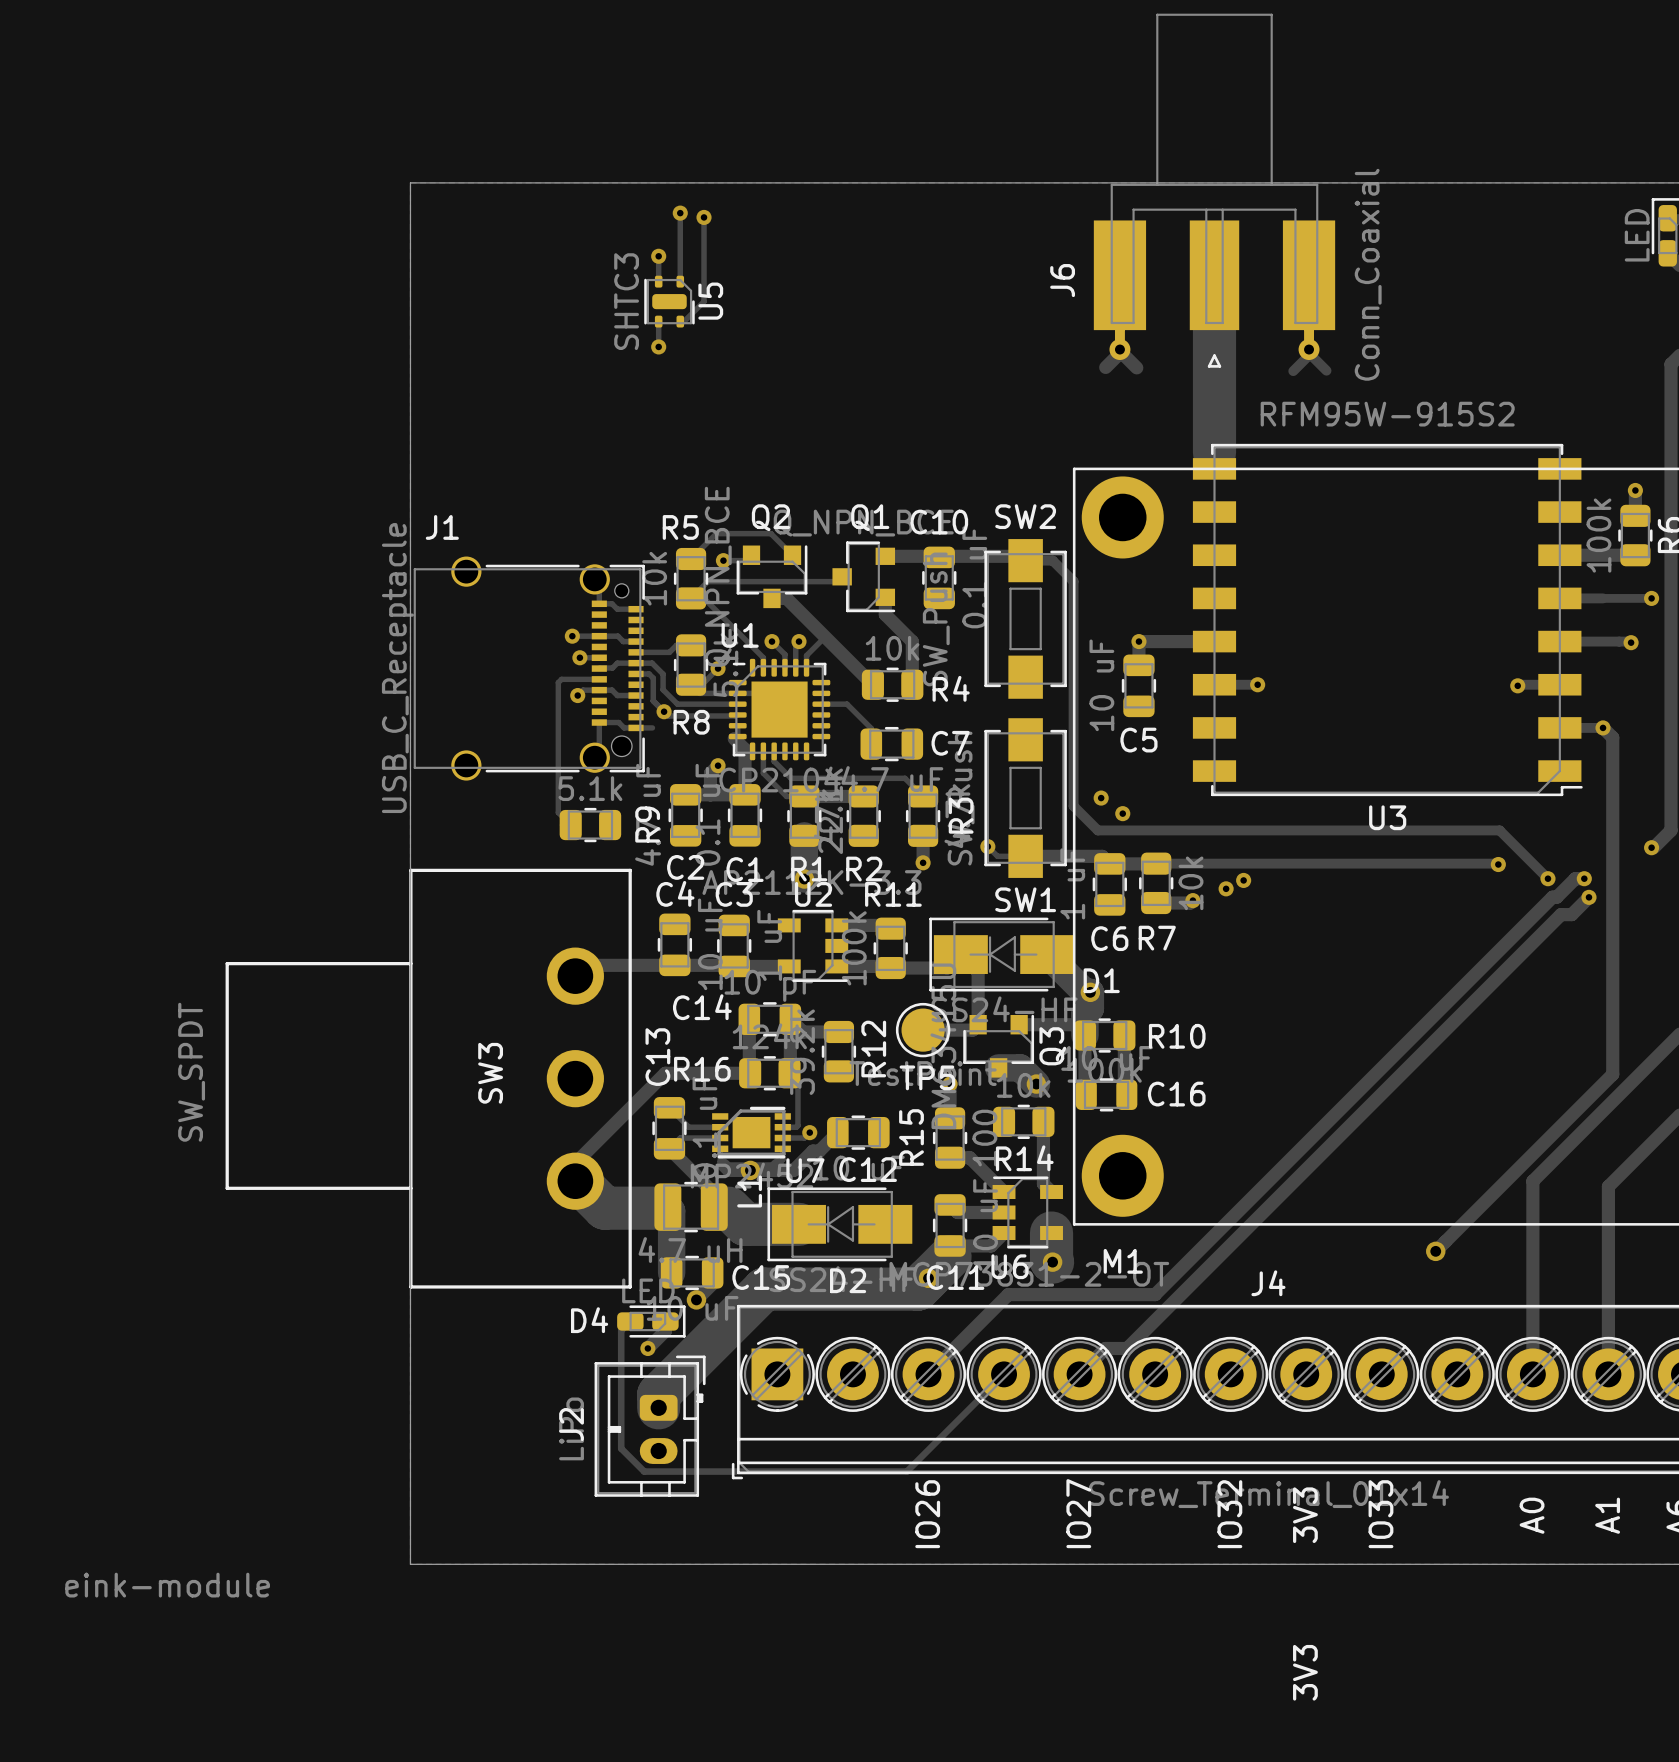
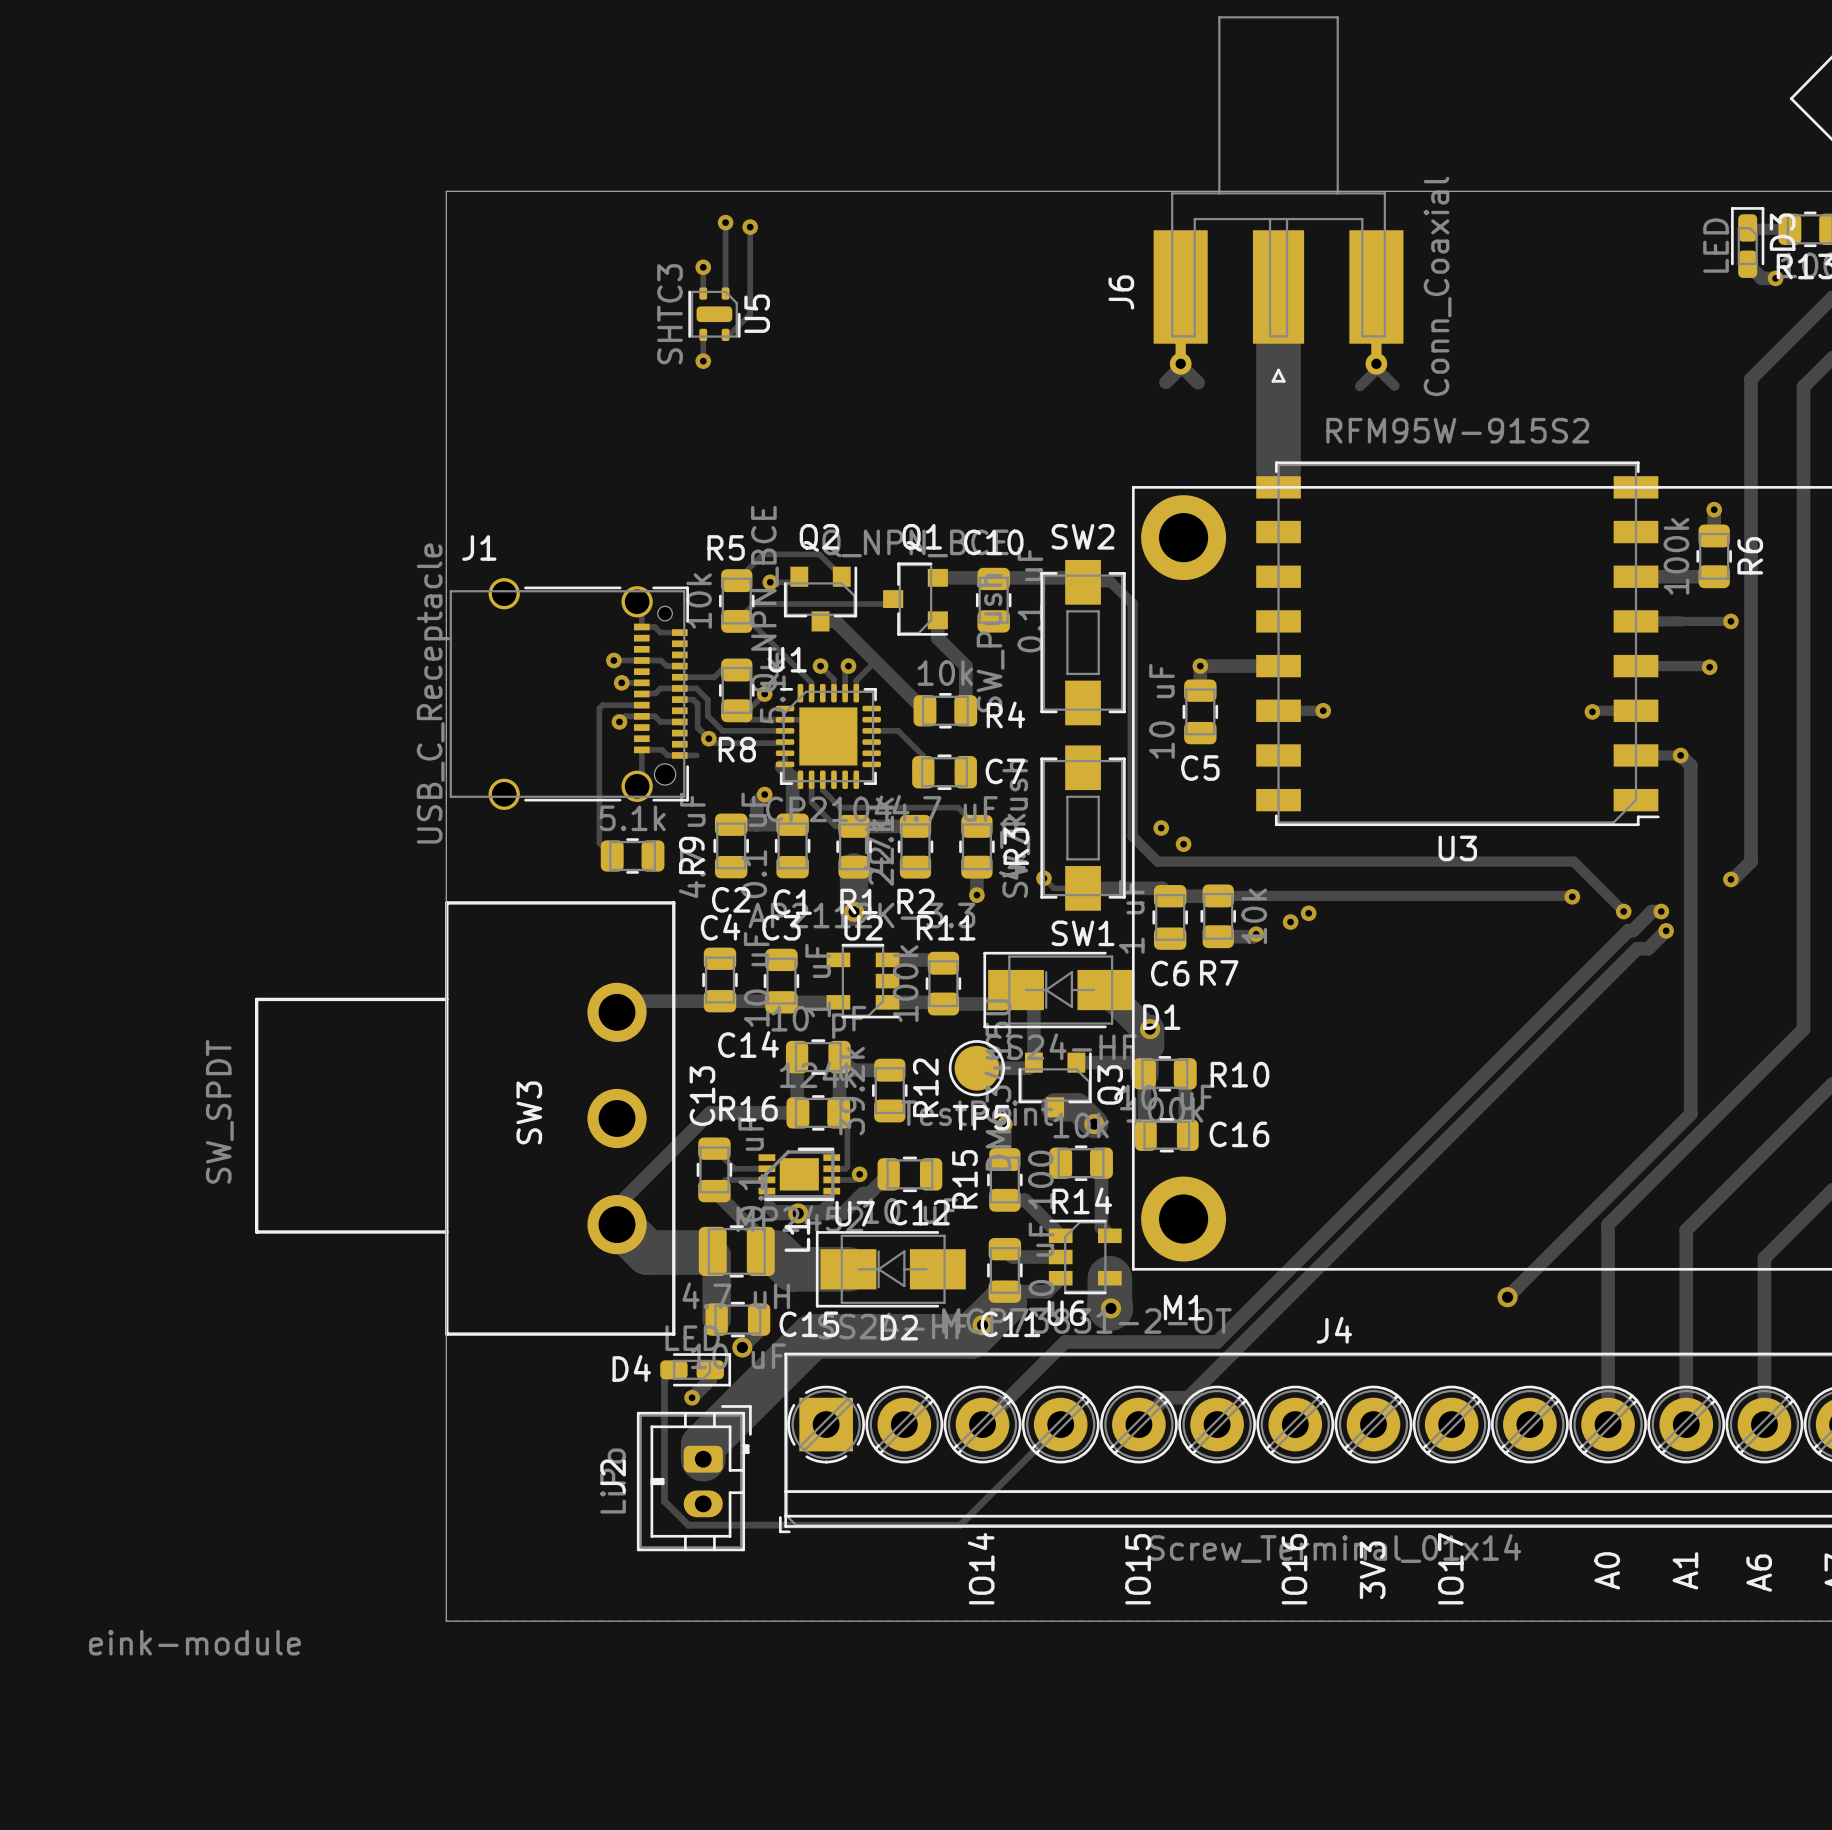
text: IO27 (1078, 1513) -> IO15 (1138, 1569)
text: IO26 (927, 1514) -> IO14 (981, 1568)
text: IO32 (1229, 1514) -> IO16 (1294, 1569)
text: IO33 (1380, 1514) -> IO17 (1450, 1568)
text: 3V3 (1305, 1672) -> none

